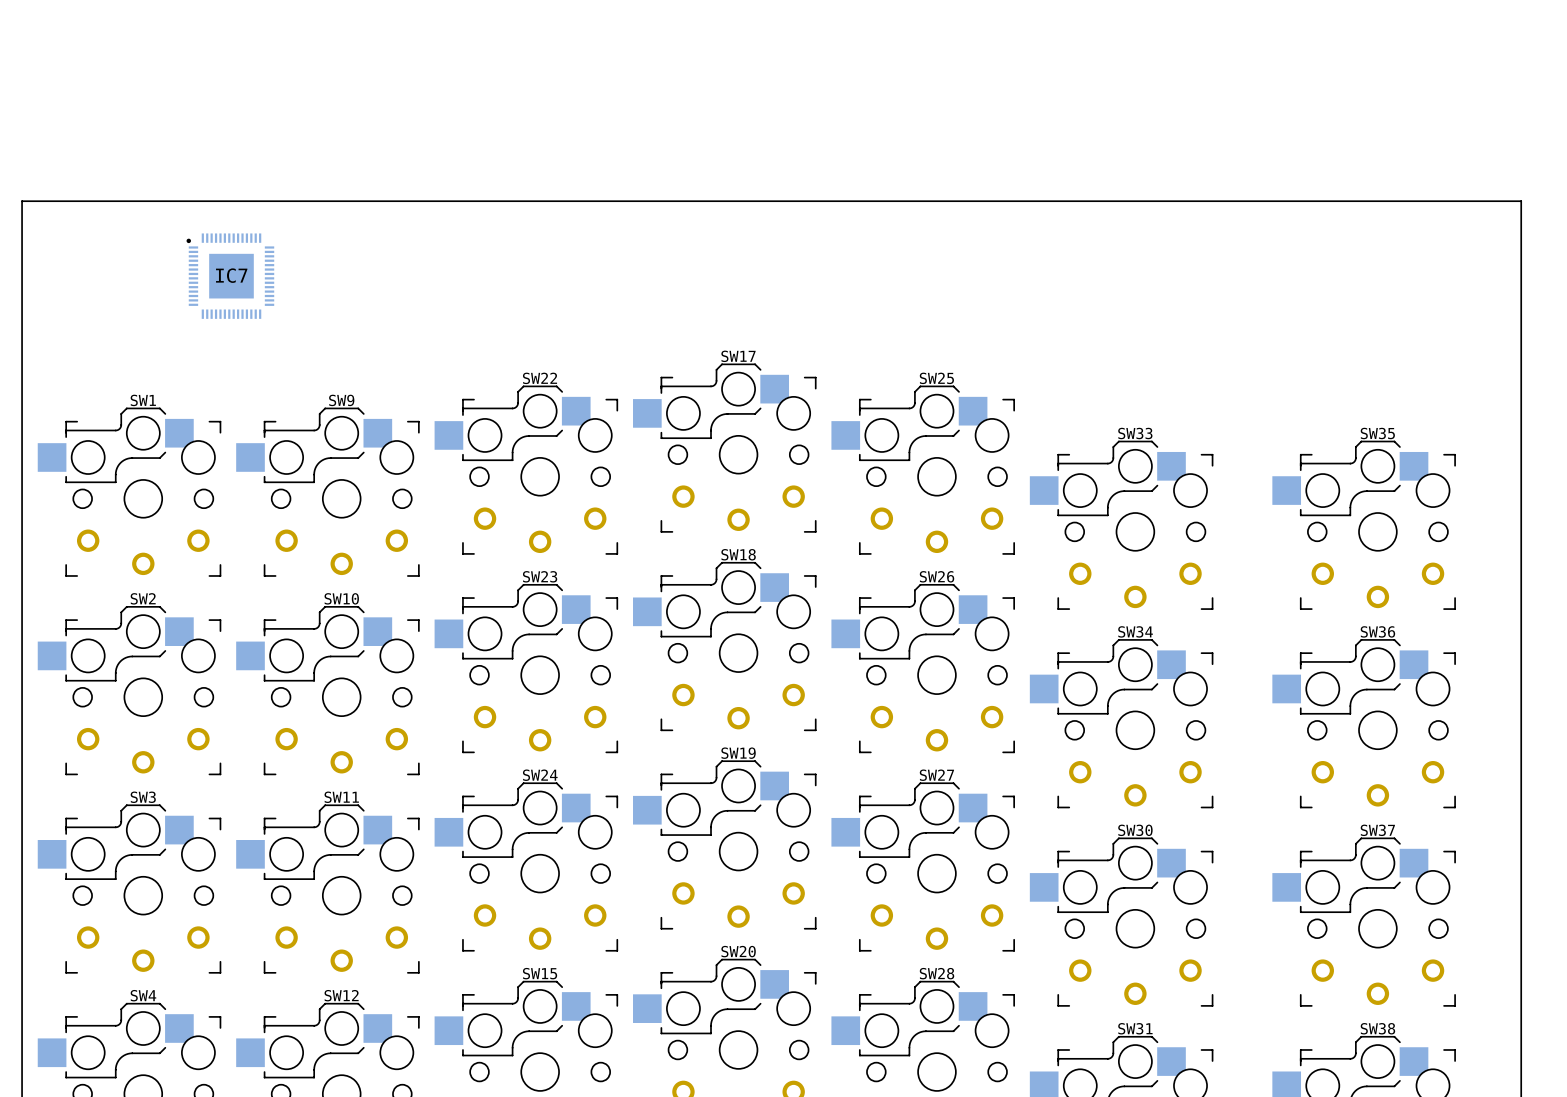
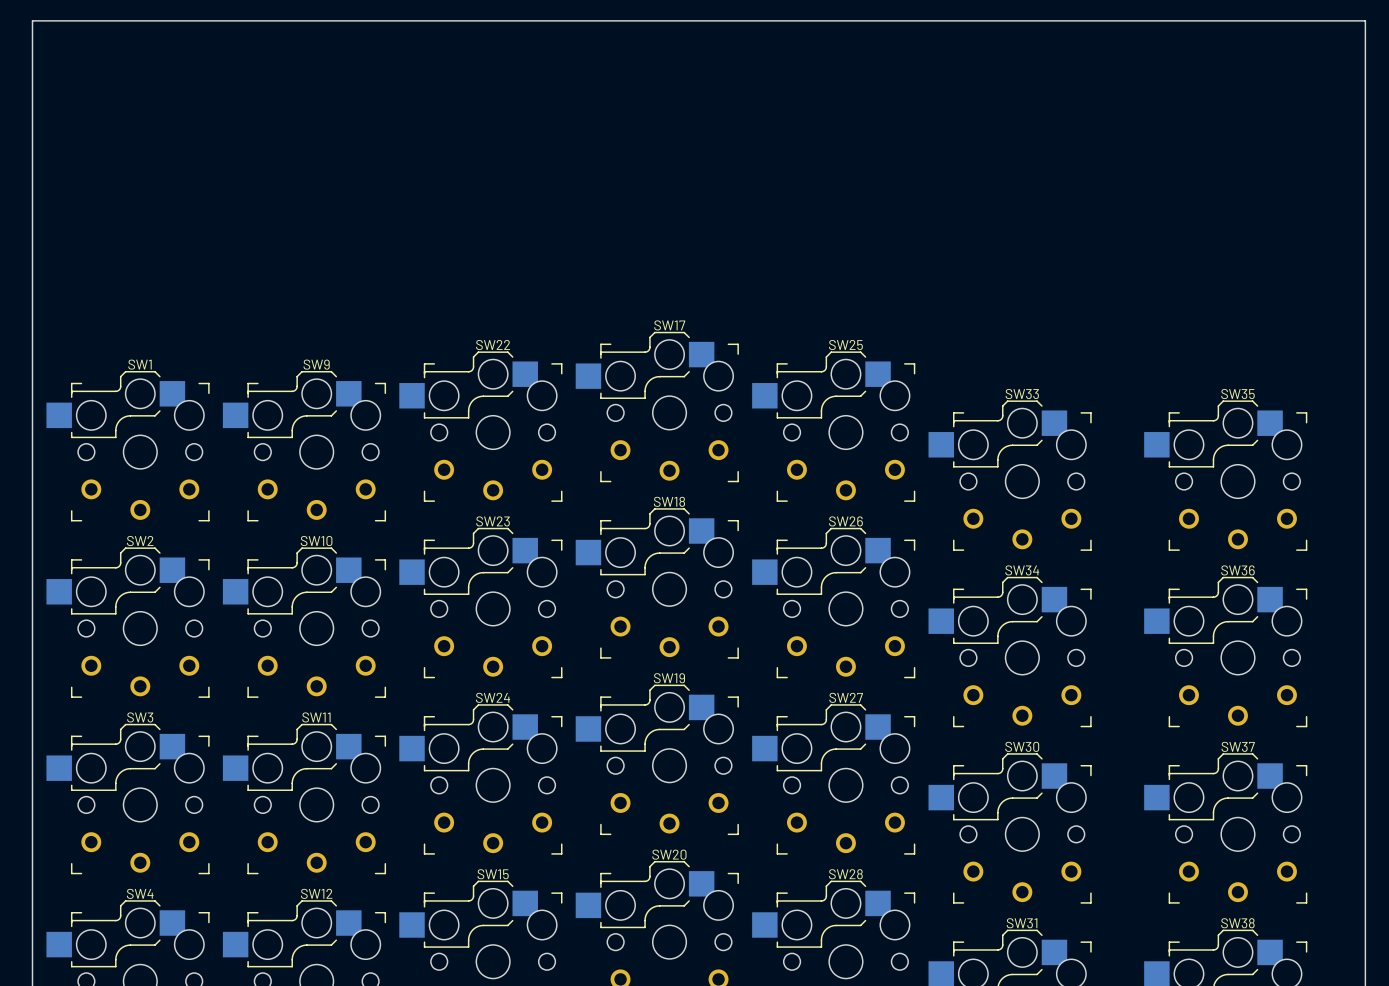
board edge: (1521, 201) (22, 201) -> (1365, 187) (1365, 20) (32, 20) (32, 187)
IC7: (230, 276) -> none

